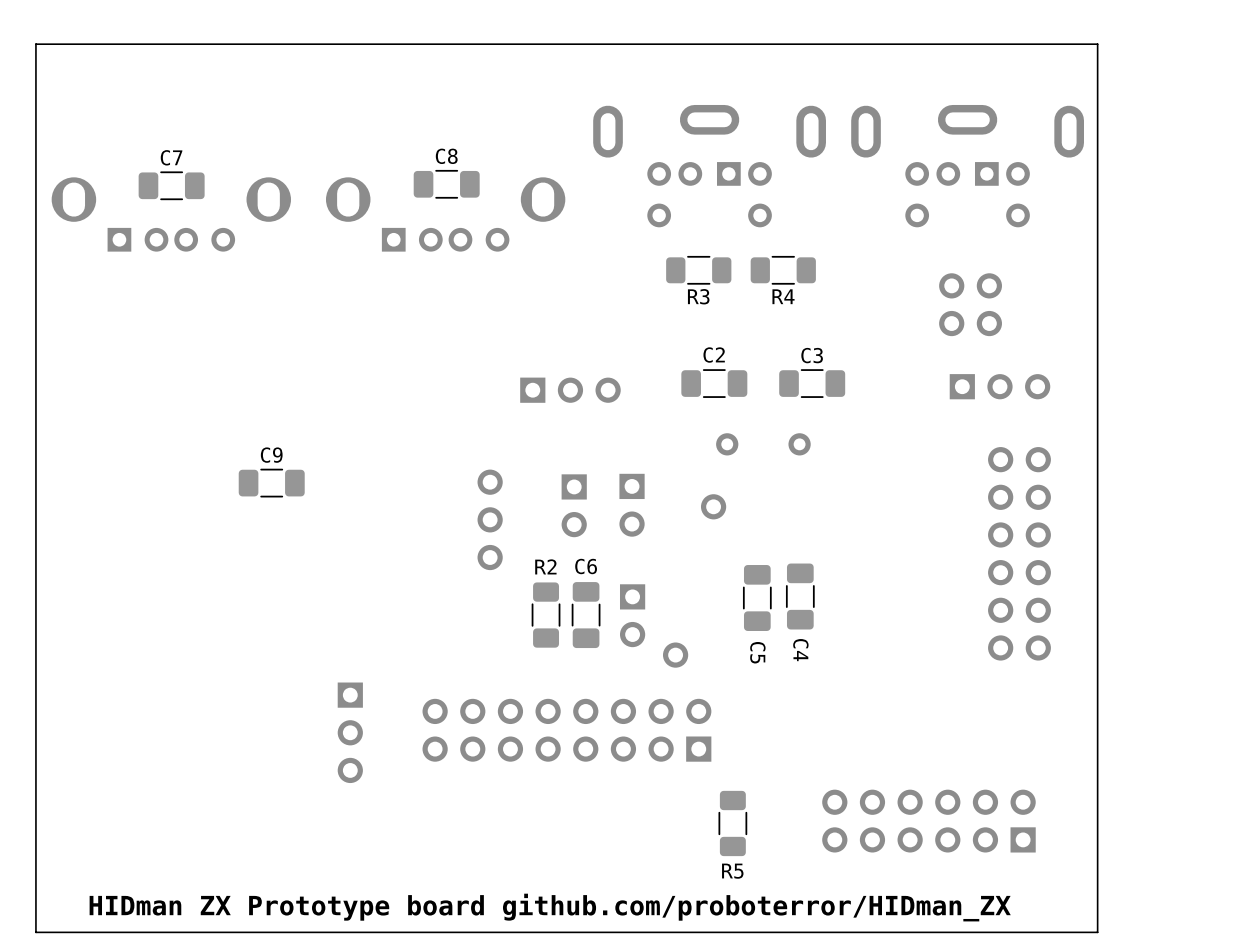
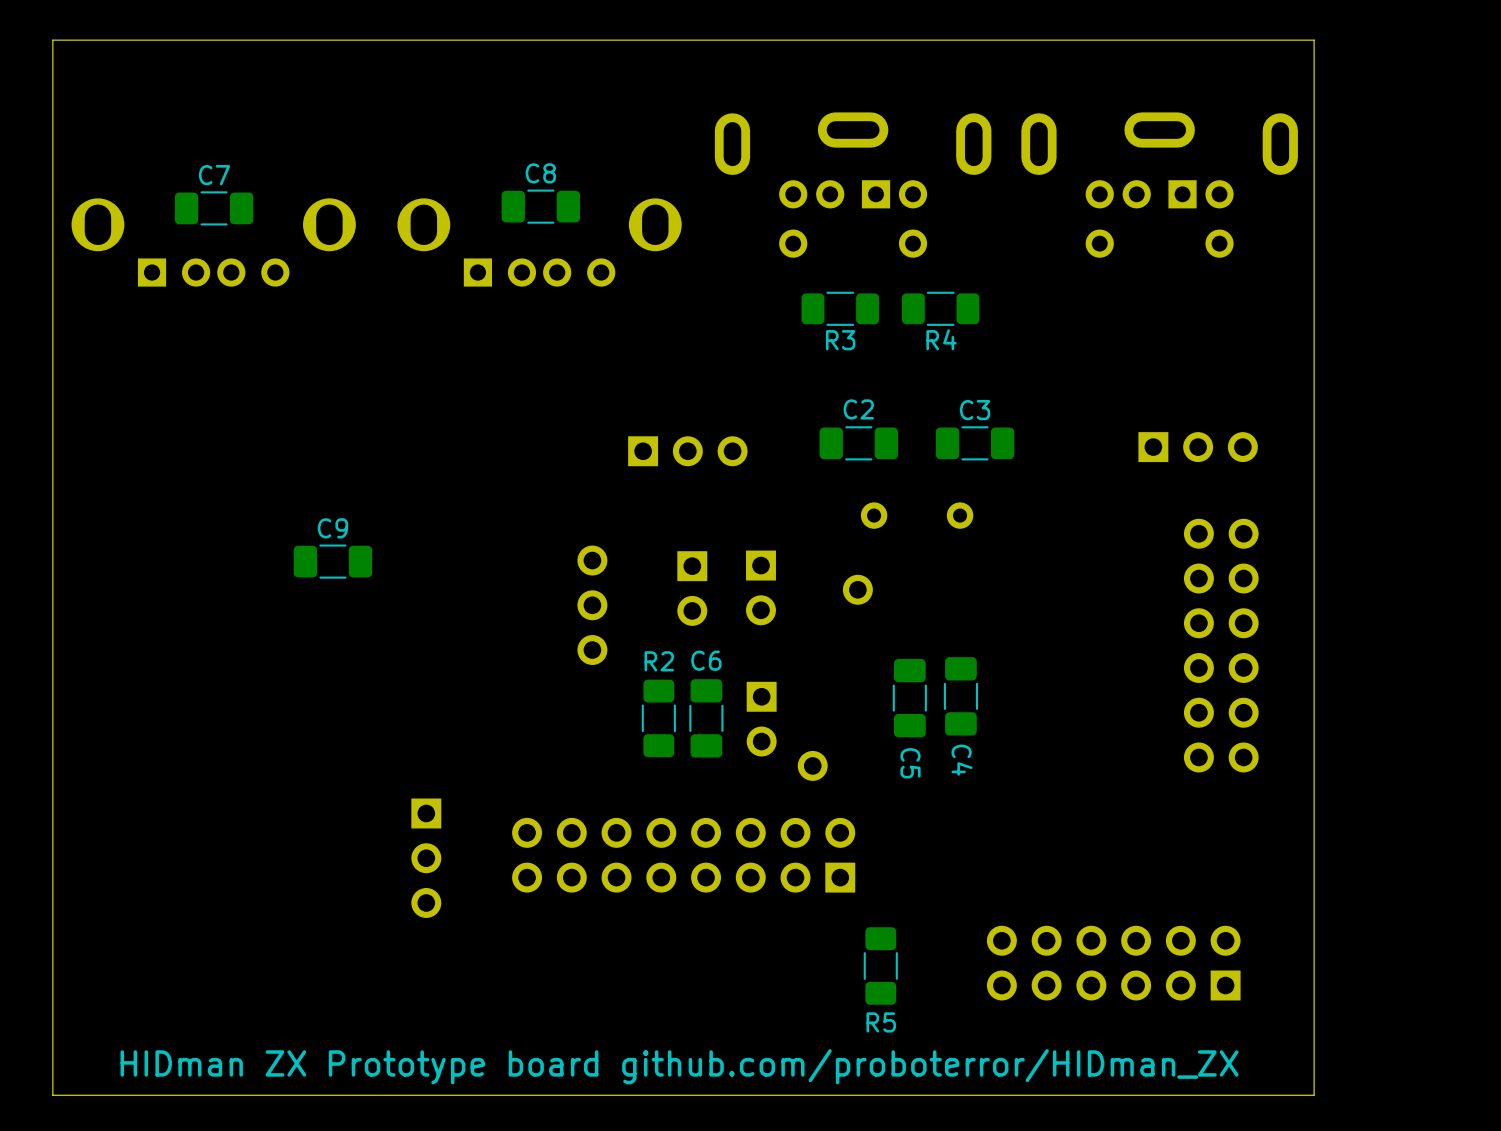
part: (951, 285) -> none
part: (989, 285) -> none
part: (951, 323) -> none
part: (989, 323) -> none

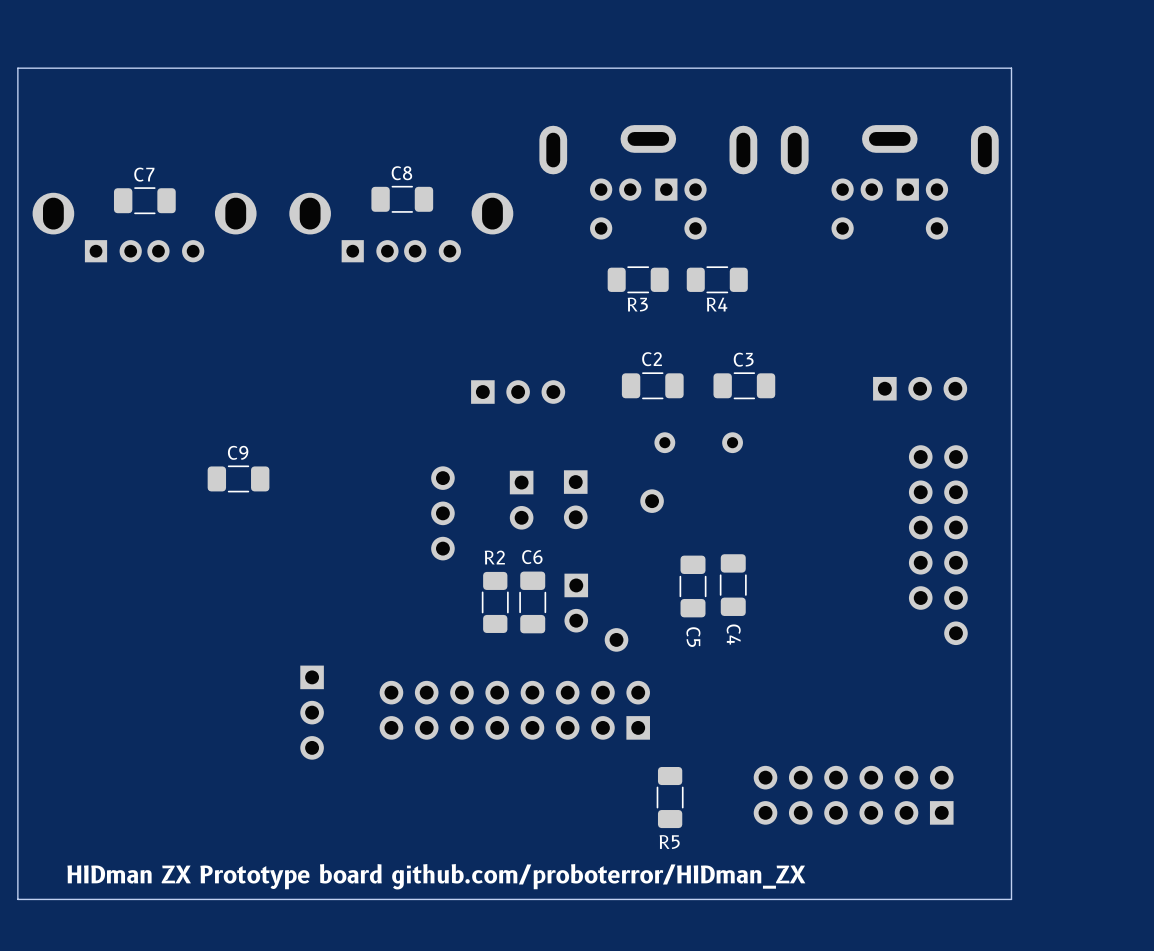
part: (1198, 757) -> none

